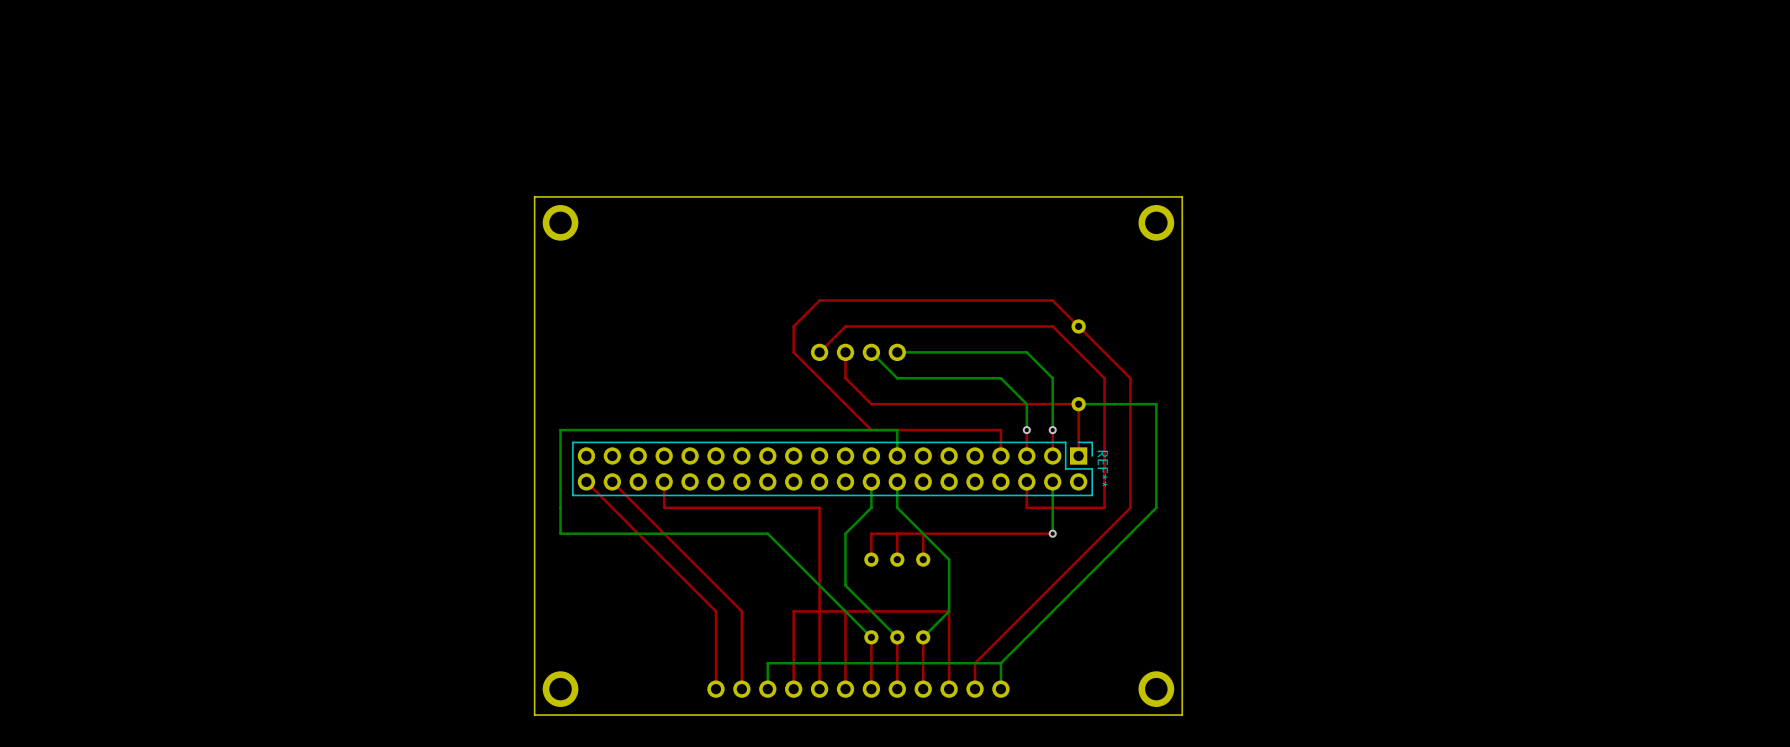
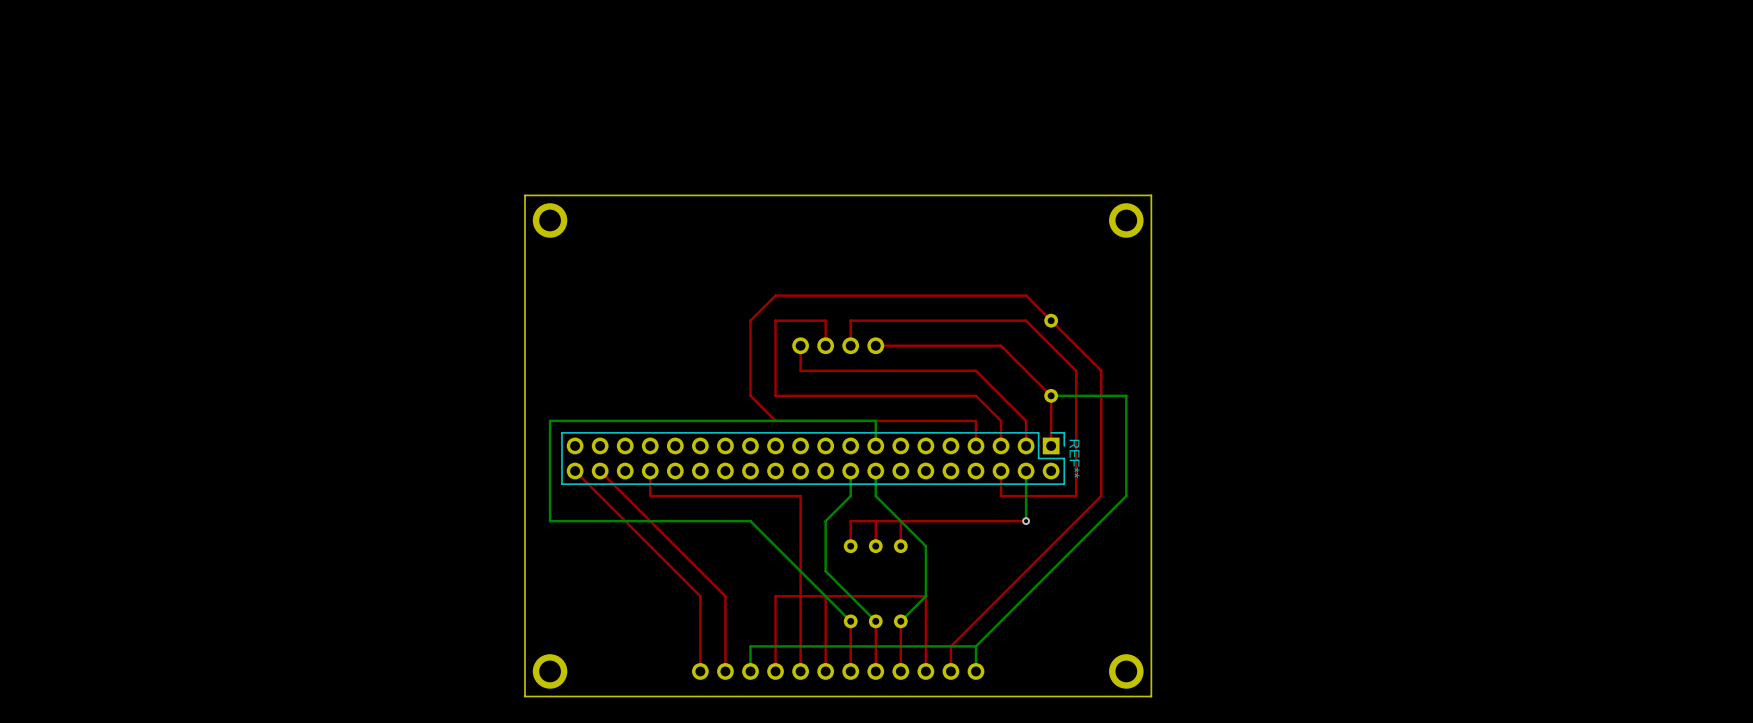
top track: (819, 300) (793, 326) -> (825, 345) (825, 320) (775, 320)
top track: none -> (800, 295) (775, 295) (750, 320) (750, 395) (775, 420) (850, 420)
top track: (871, 326) (845, 326) (819, 352) -> (850, 320) (850, 345)
top track: (793, 352) (871, 430) -> (775, 345) (775, 395) (850, 395)
top track: none -> (800, 345) (800, 370) (975, 370) (1026, 420)
top track: (845, 352) (845, 378) (871, 404) -> none
bottom track: (871, 352) (897, 378) (1000, 378) (1026, 404) (1026, 430) -> none
top track: none -> (875, 345) (1001, 345) (1051, 395)
bottom track: (897, 352) (1026, 352) (1052, 378) (1052, 430) -> none
top track: (1078, 404) (1000, 404) -> (1001, 420) (975, 395)
via: (1026, 430) -> none
via: (1052, 430) -> none

